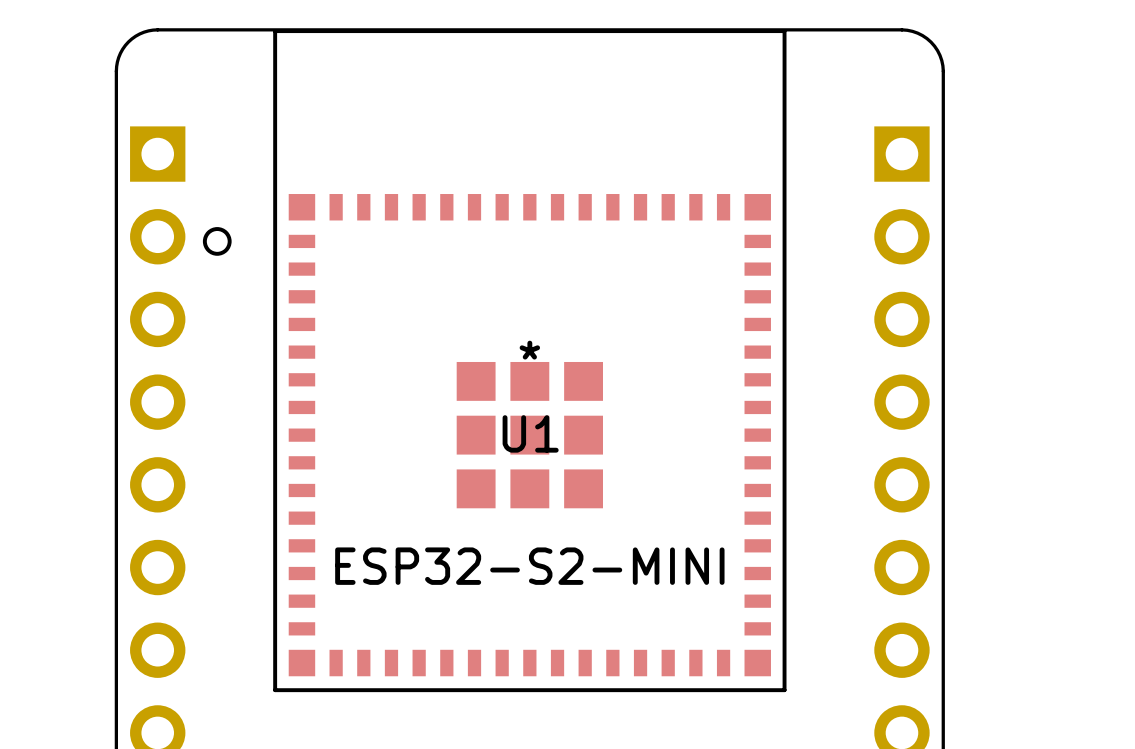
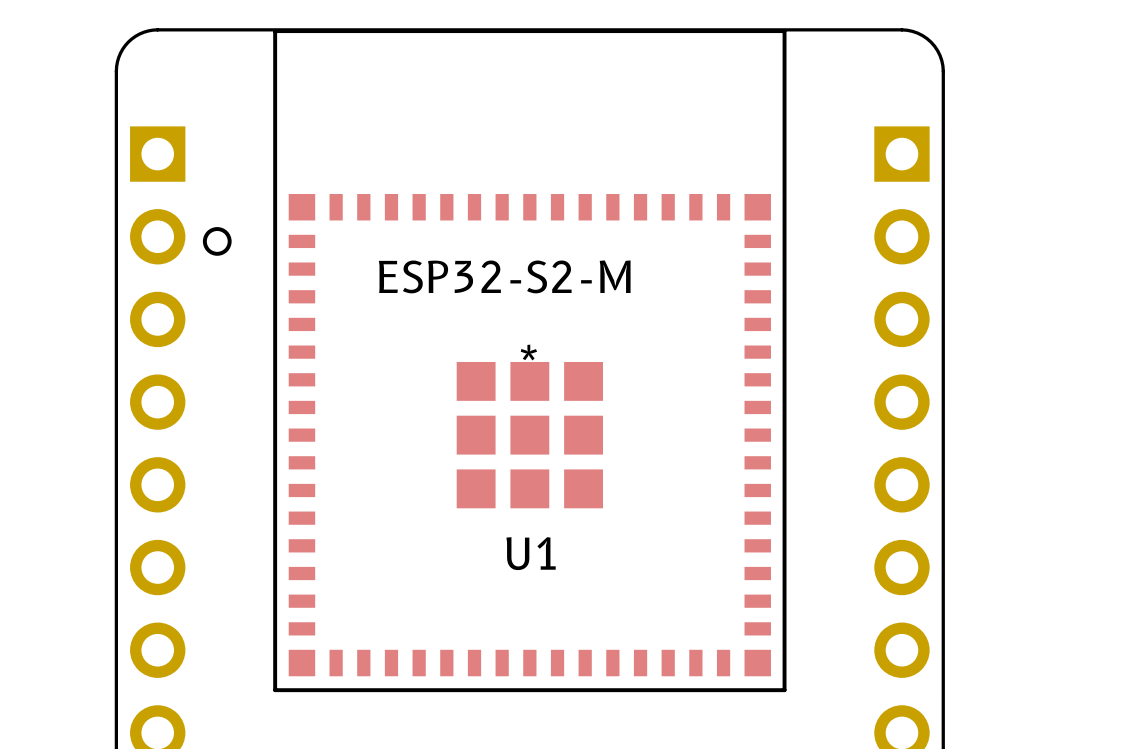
U1 name position: U1 (530, 433) -> U1 (531, 553)
U1 value: ESP32-S2-MINI (529, 566) -> ESP32-S2-M (504, 276)

